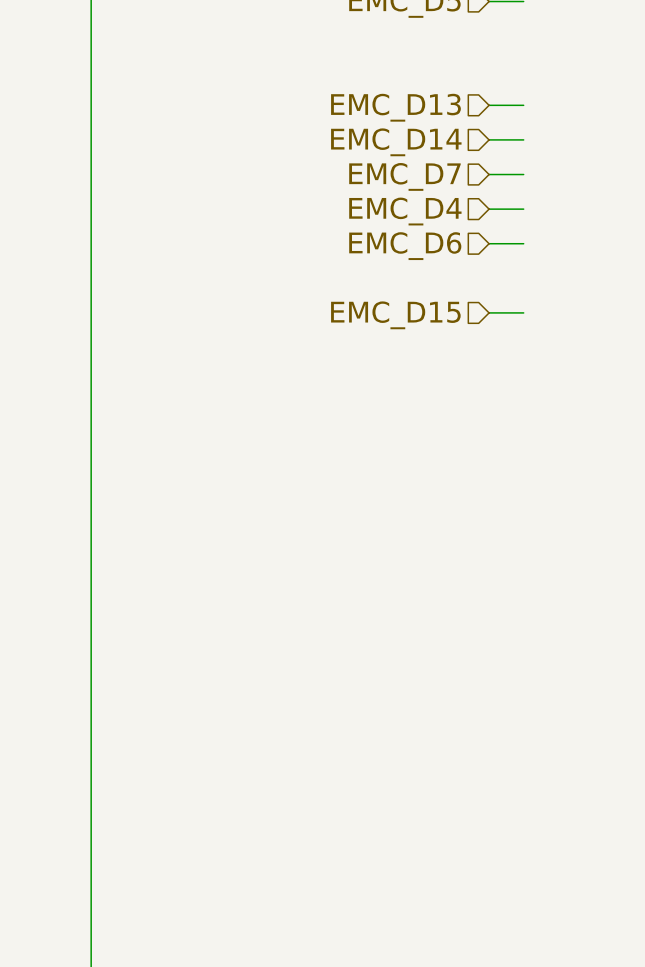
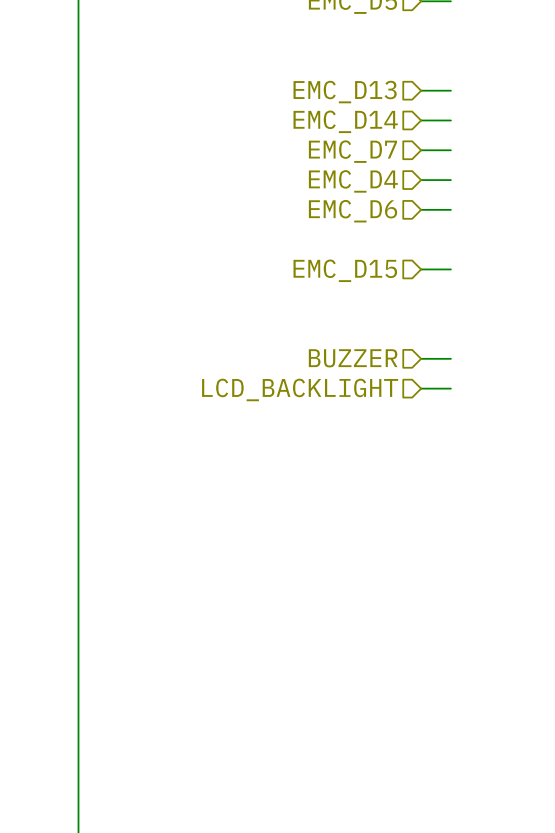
hierarchical label: none -> BUZZER (353, 358)
wire: none -> (421, 358) (450, 358)
wire: none -> (421, 388) (450, 388)
hierarchical label: none -> LCD_BACKLIGHT (300, 389)

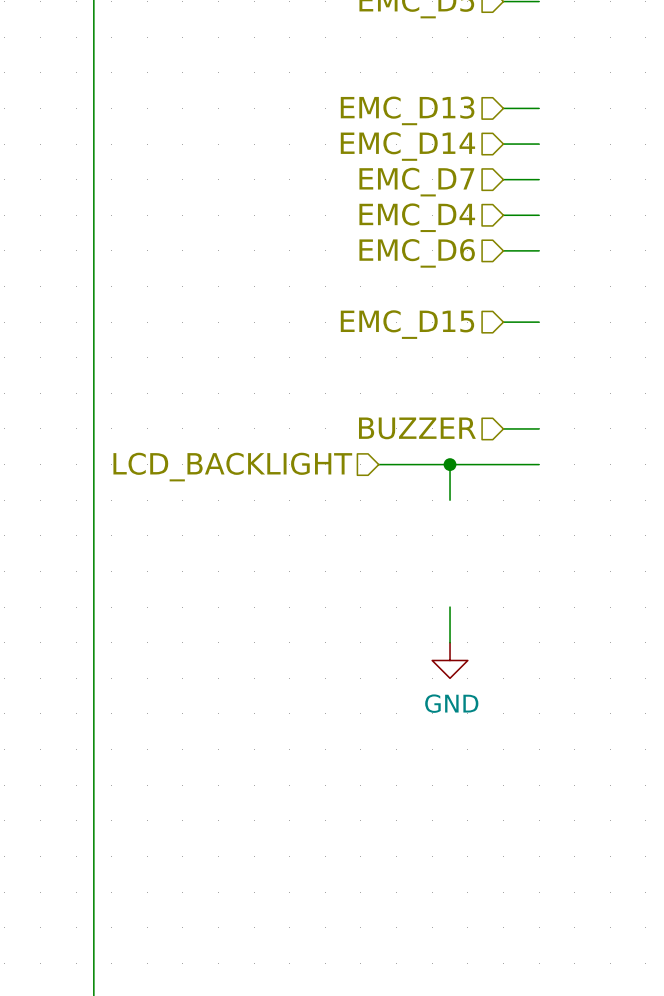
wire: none -> (378, 464) (503, 464)
wire: none -> (450, 464) (450, 500)
junction: none -> (450, 464)
hierarchical label position: LCD_BACKLIGHT (300, 389) -> LCD_BACKLIGHT (232, 467)
wire: none -> (450, 607) (450, 642)
power symbol: none -> GND (450, 660)

